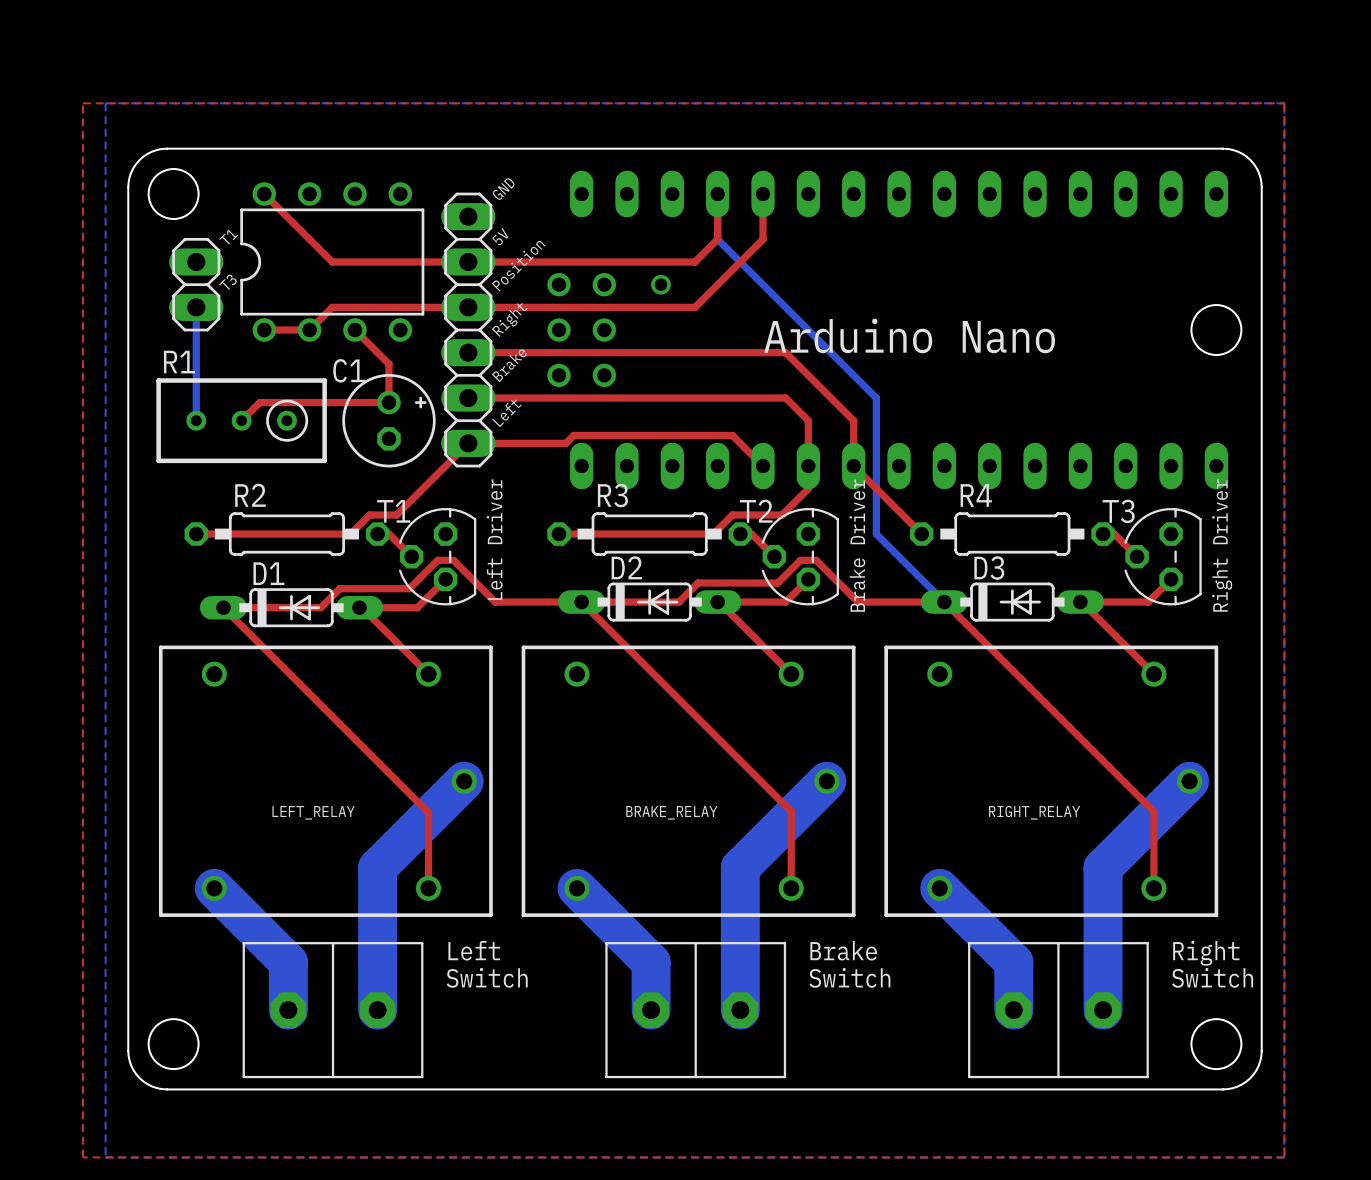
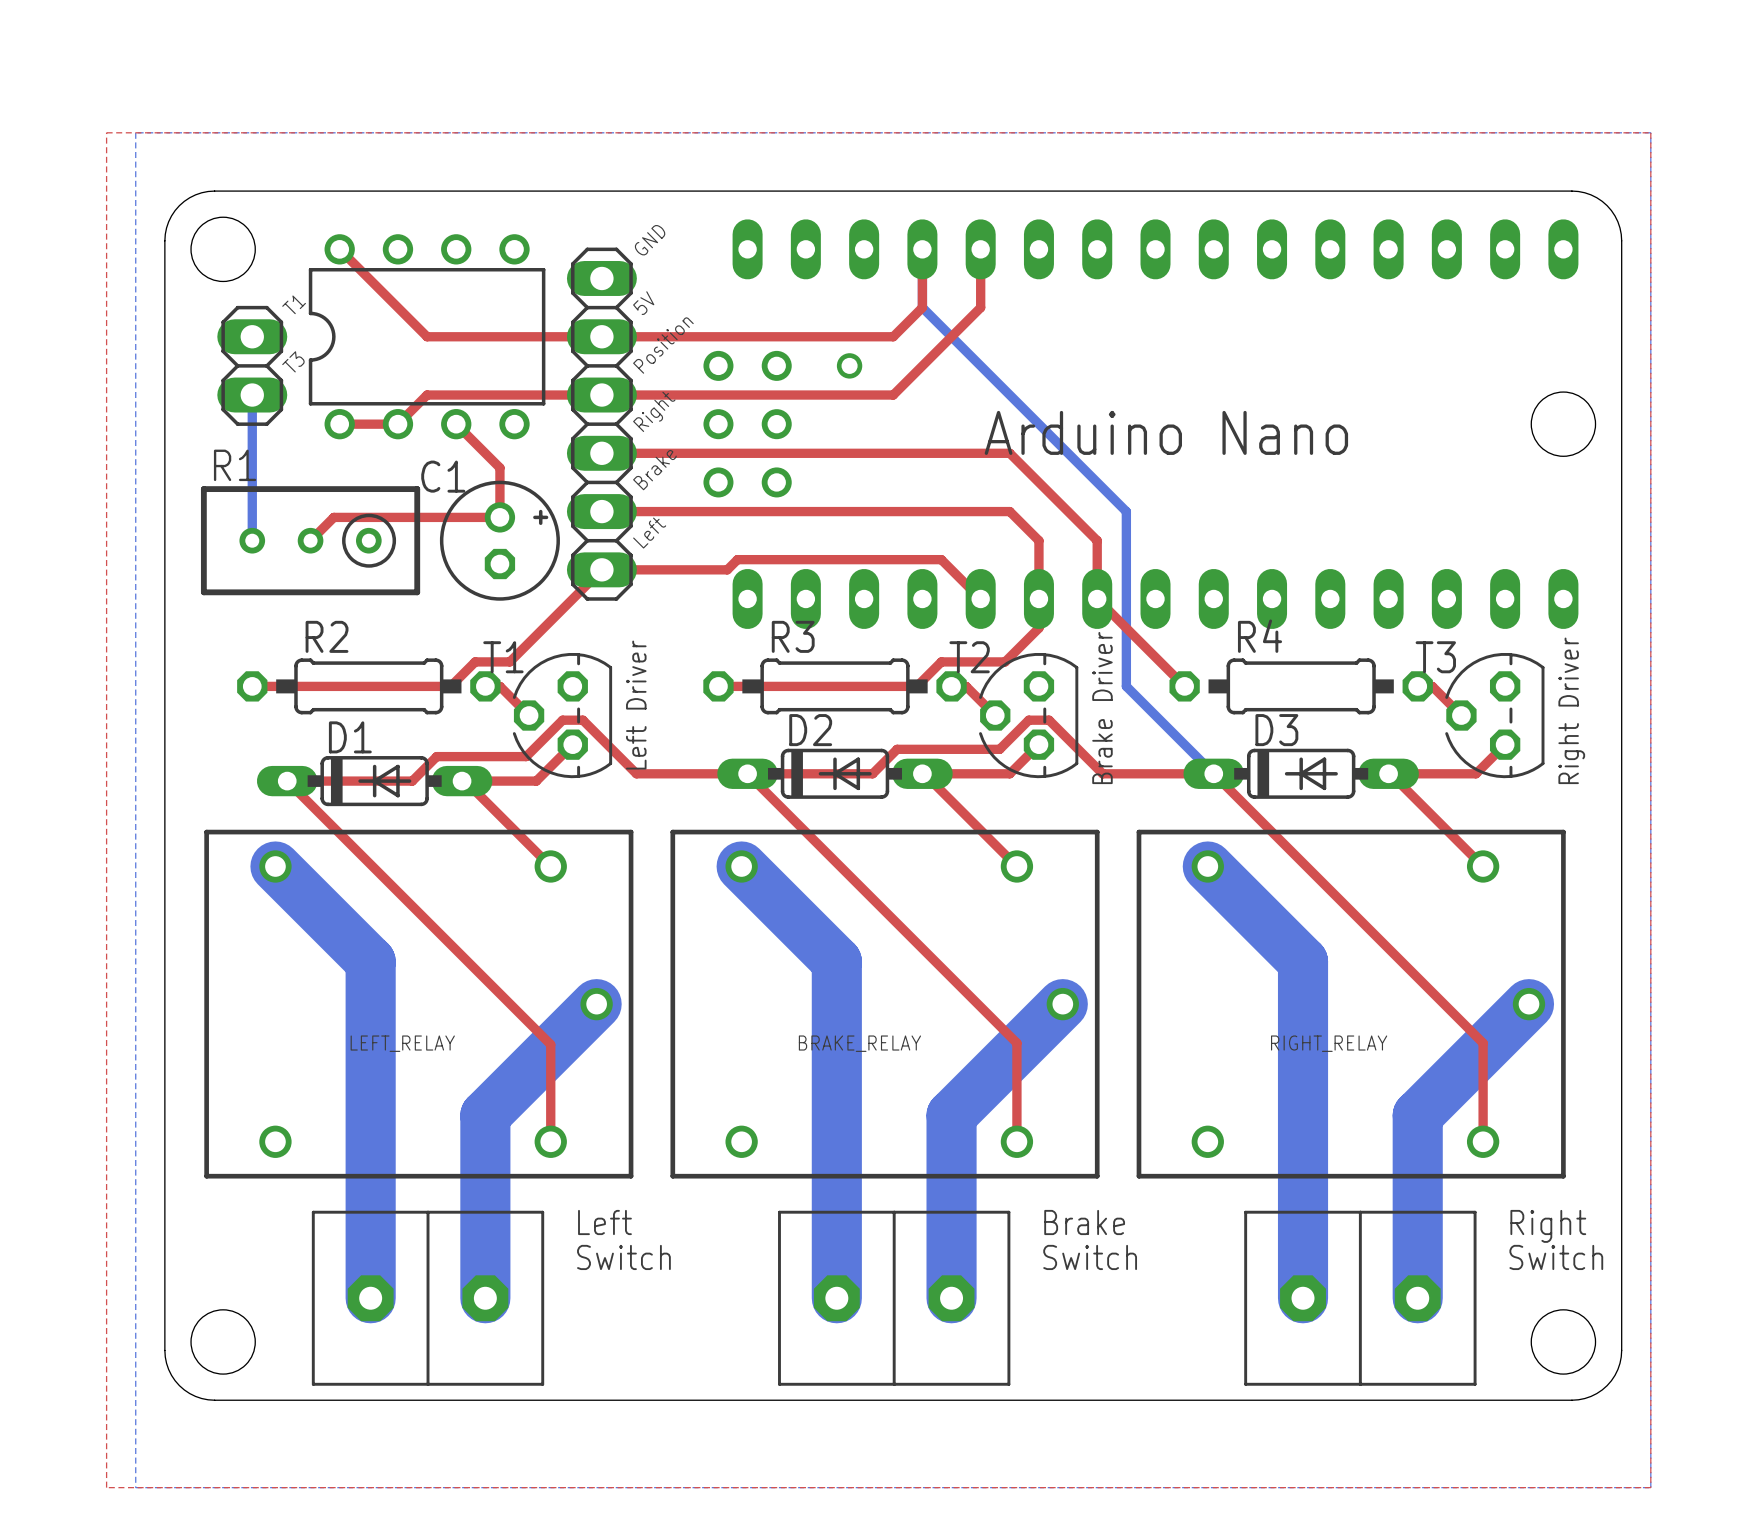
bottom track: (214, 888) (288, 962) -> (275, 866) (370, 961) (370, 1236)
bottom track: (577, 888) (651, 962) -> (741, 866) (836, 961) (836, 1236)
bottom track: (939, 888) (1013, 962) -> (1207, 866) (1303, 961) (1303, 1236)

